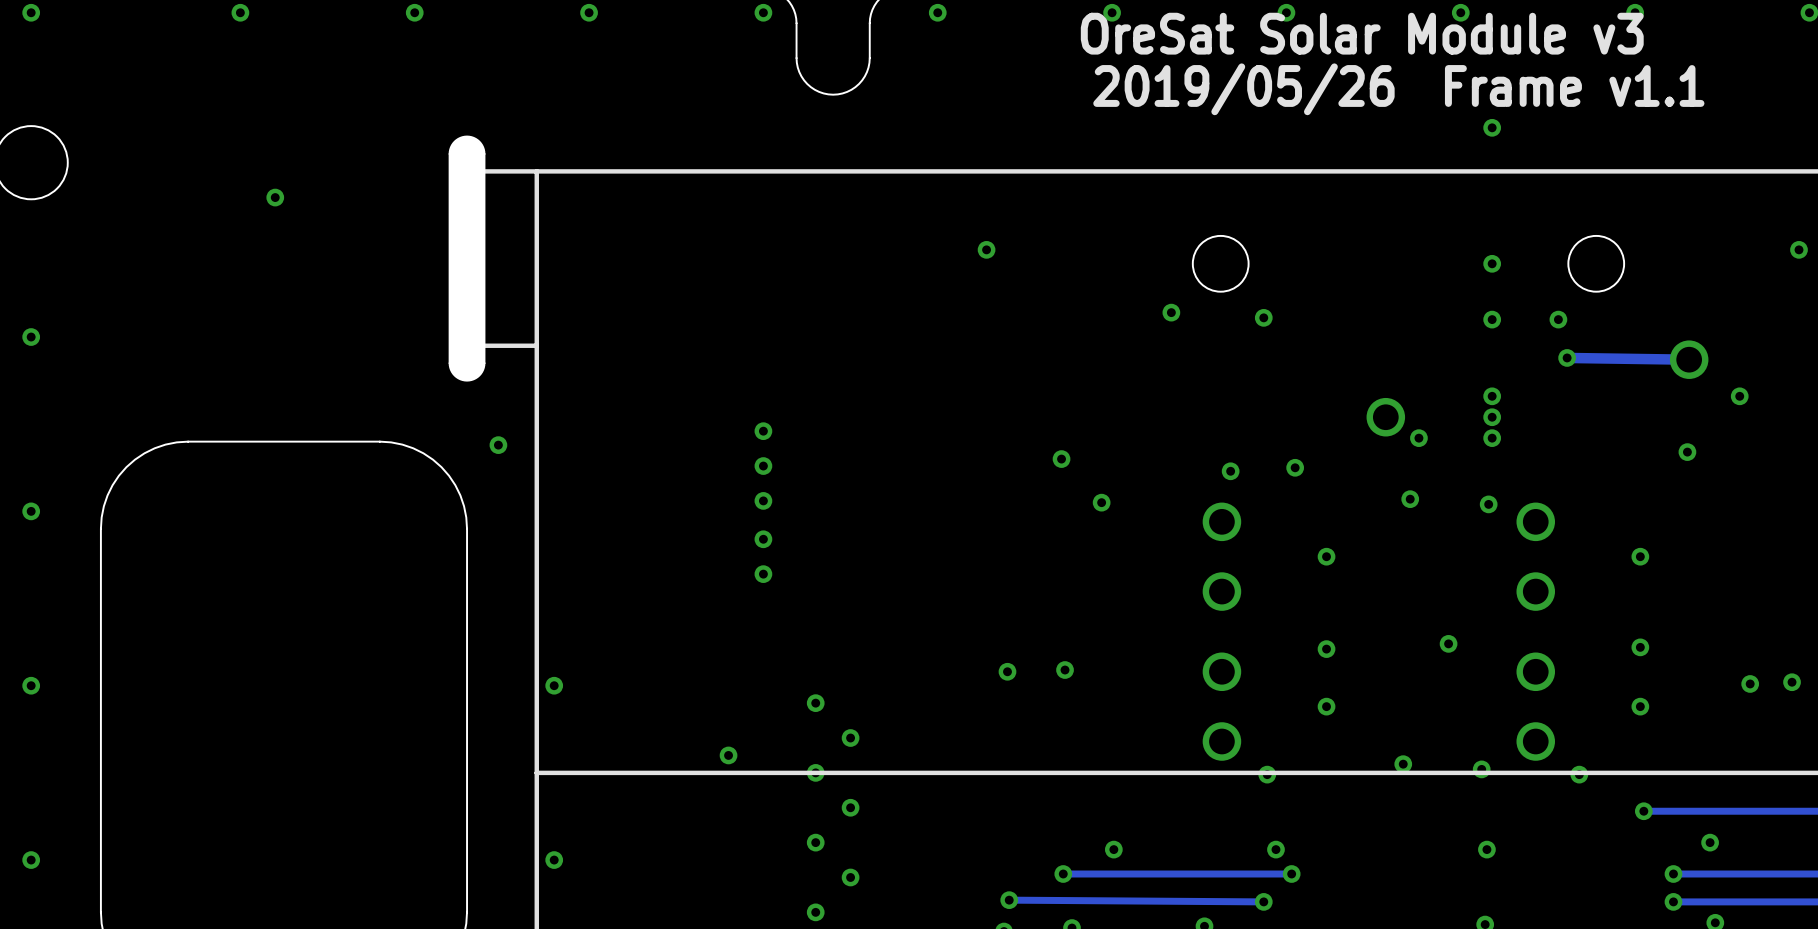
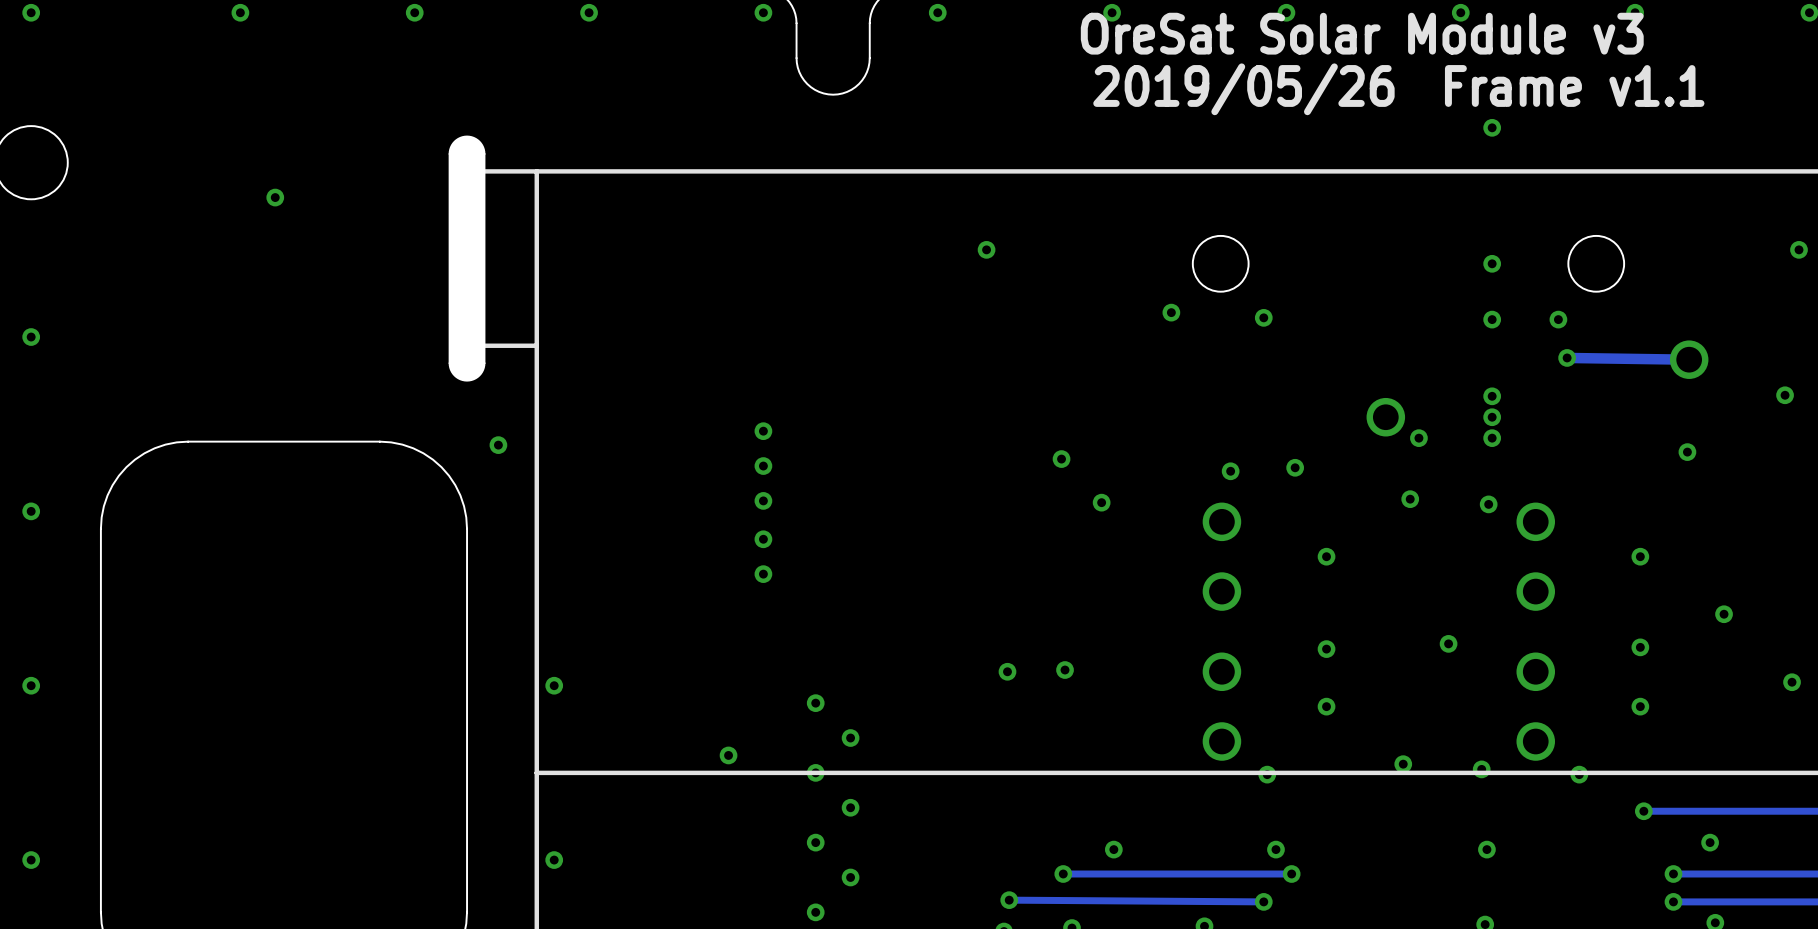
via position: (1739, 396) -> (1785, 395)
via position: (1750, 683) -> (1724, 614)

